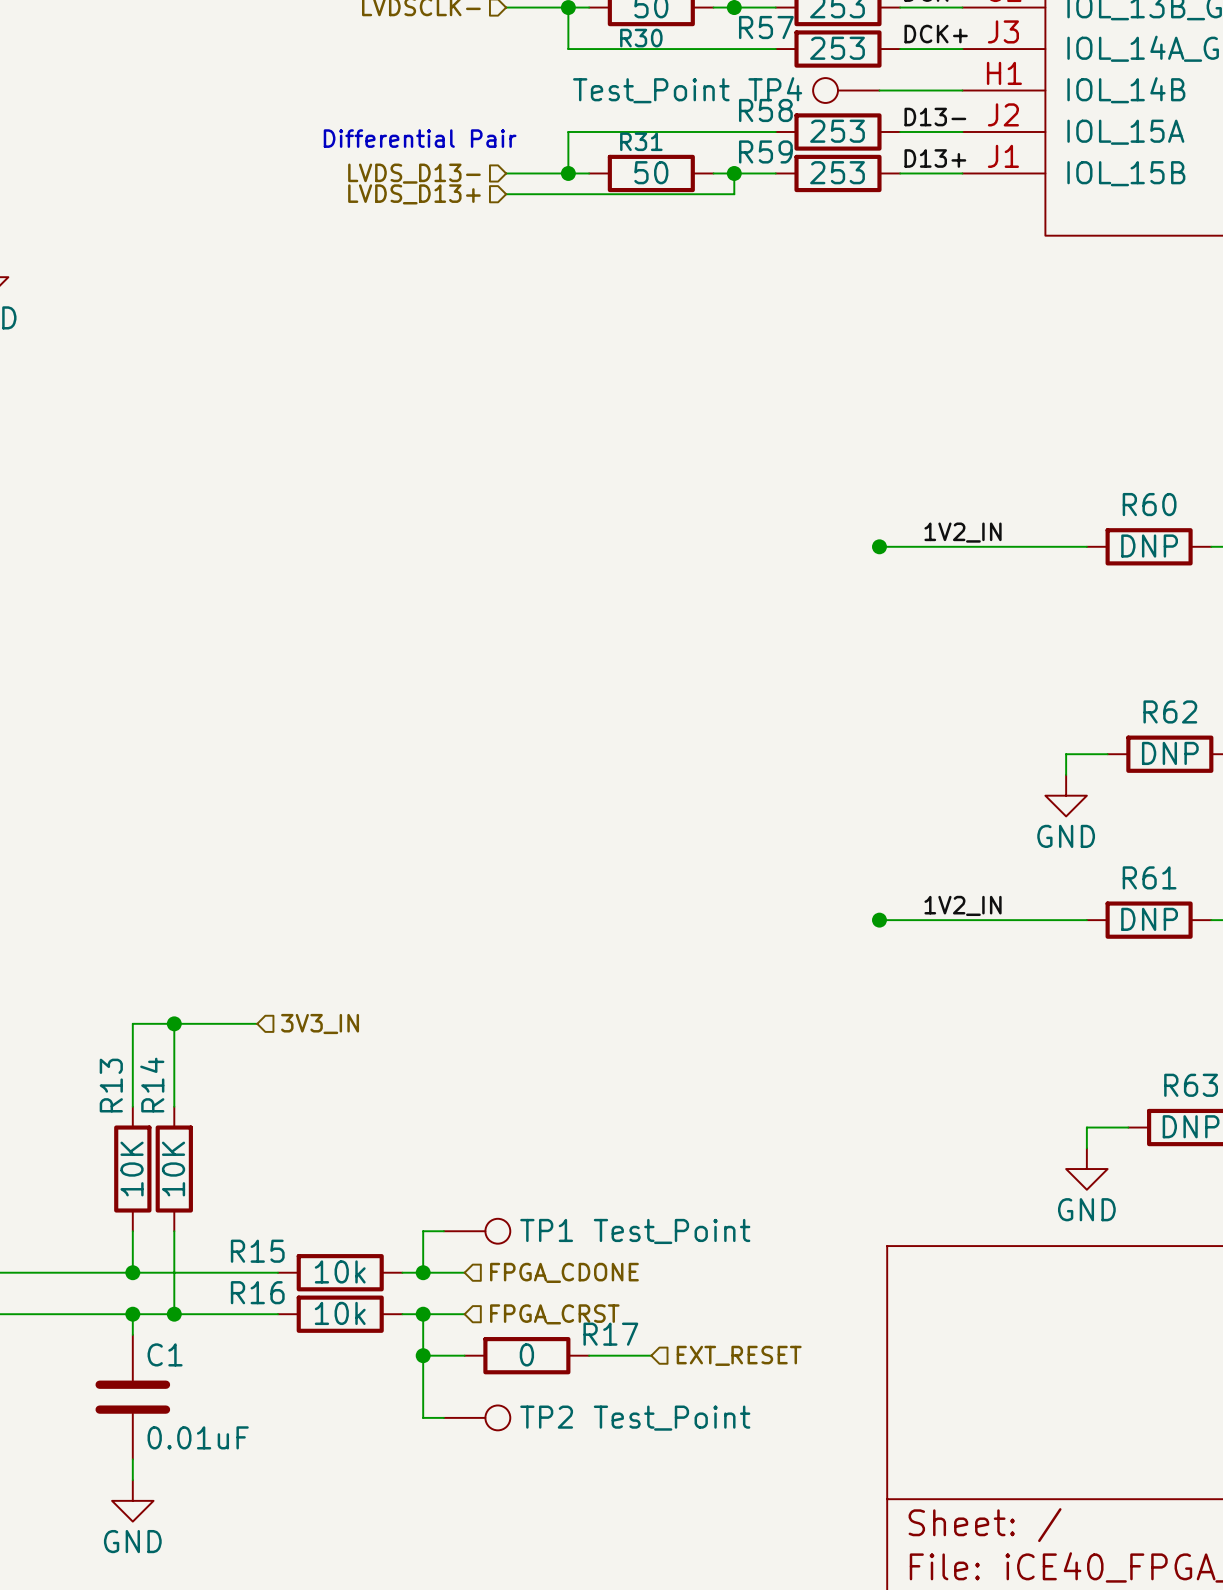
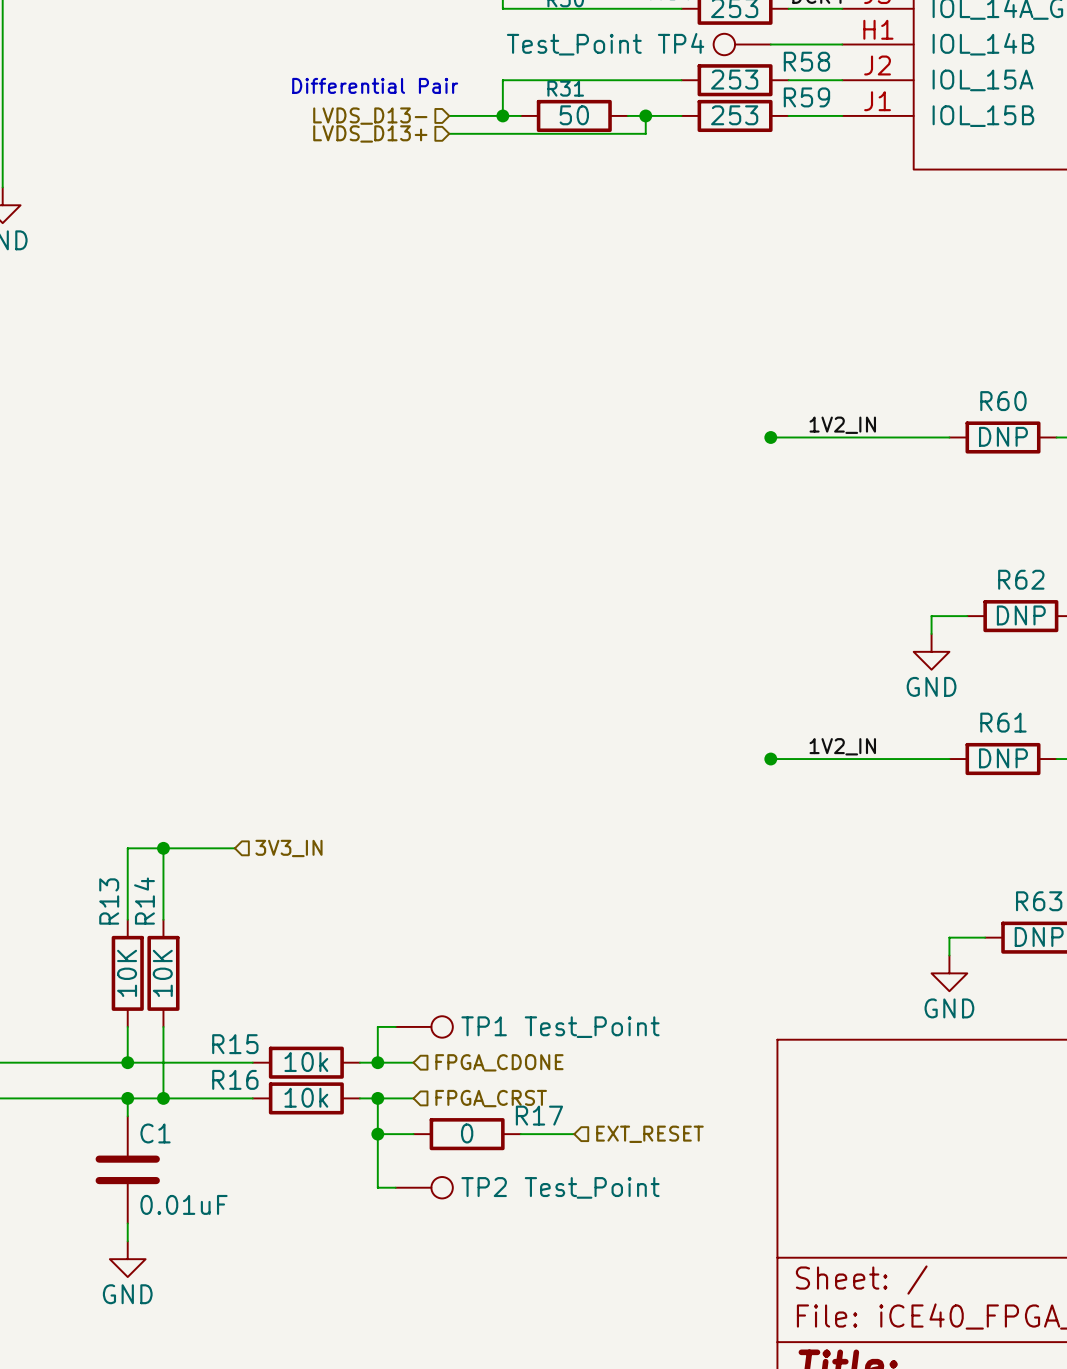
R58 name position: R58 (765, 110) -> R58 (806, 61)
label: D13- (935, 117) -> none
R59 name position: R59 (765, 151) -> R59 (806, 97)
label: D13+ (935, 158) -> none

